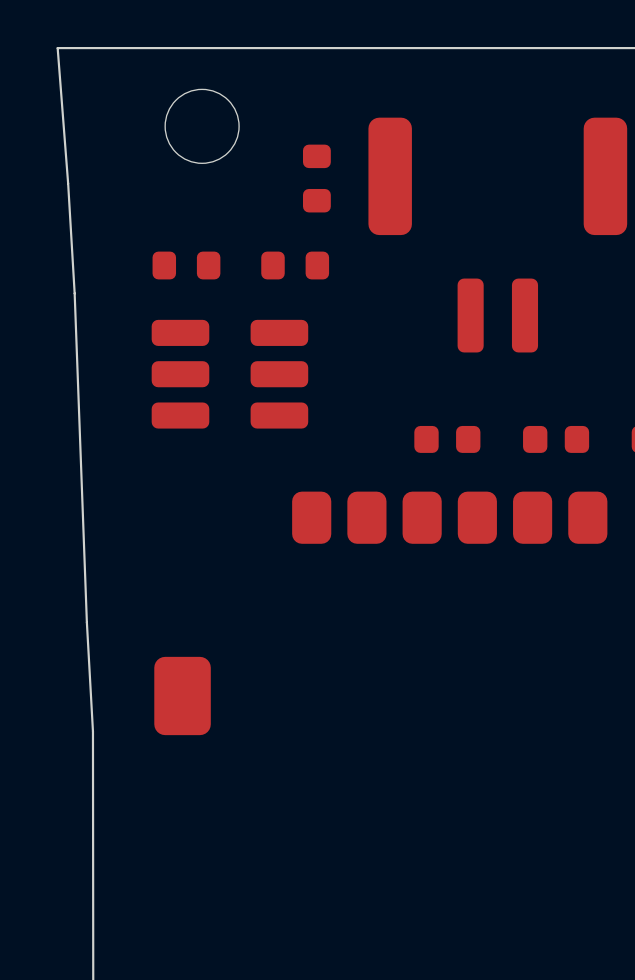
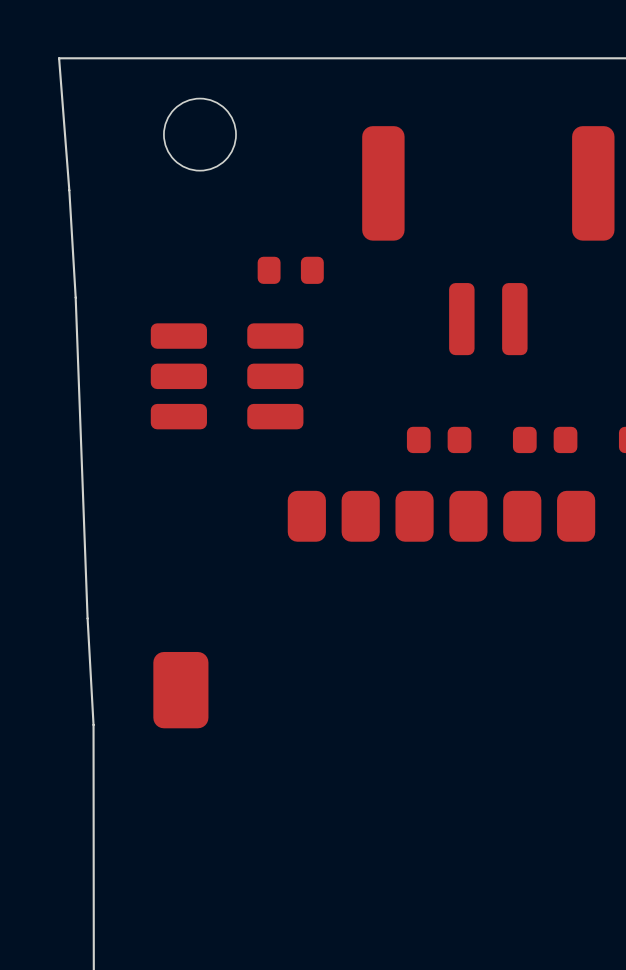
part: (316, 178) -> none
part: (186, 265) -> none

